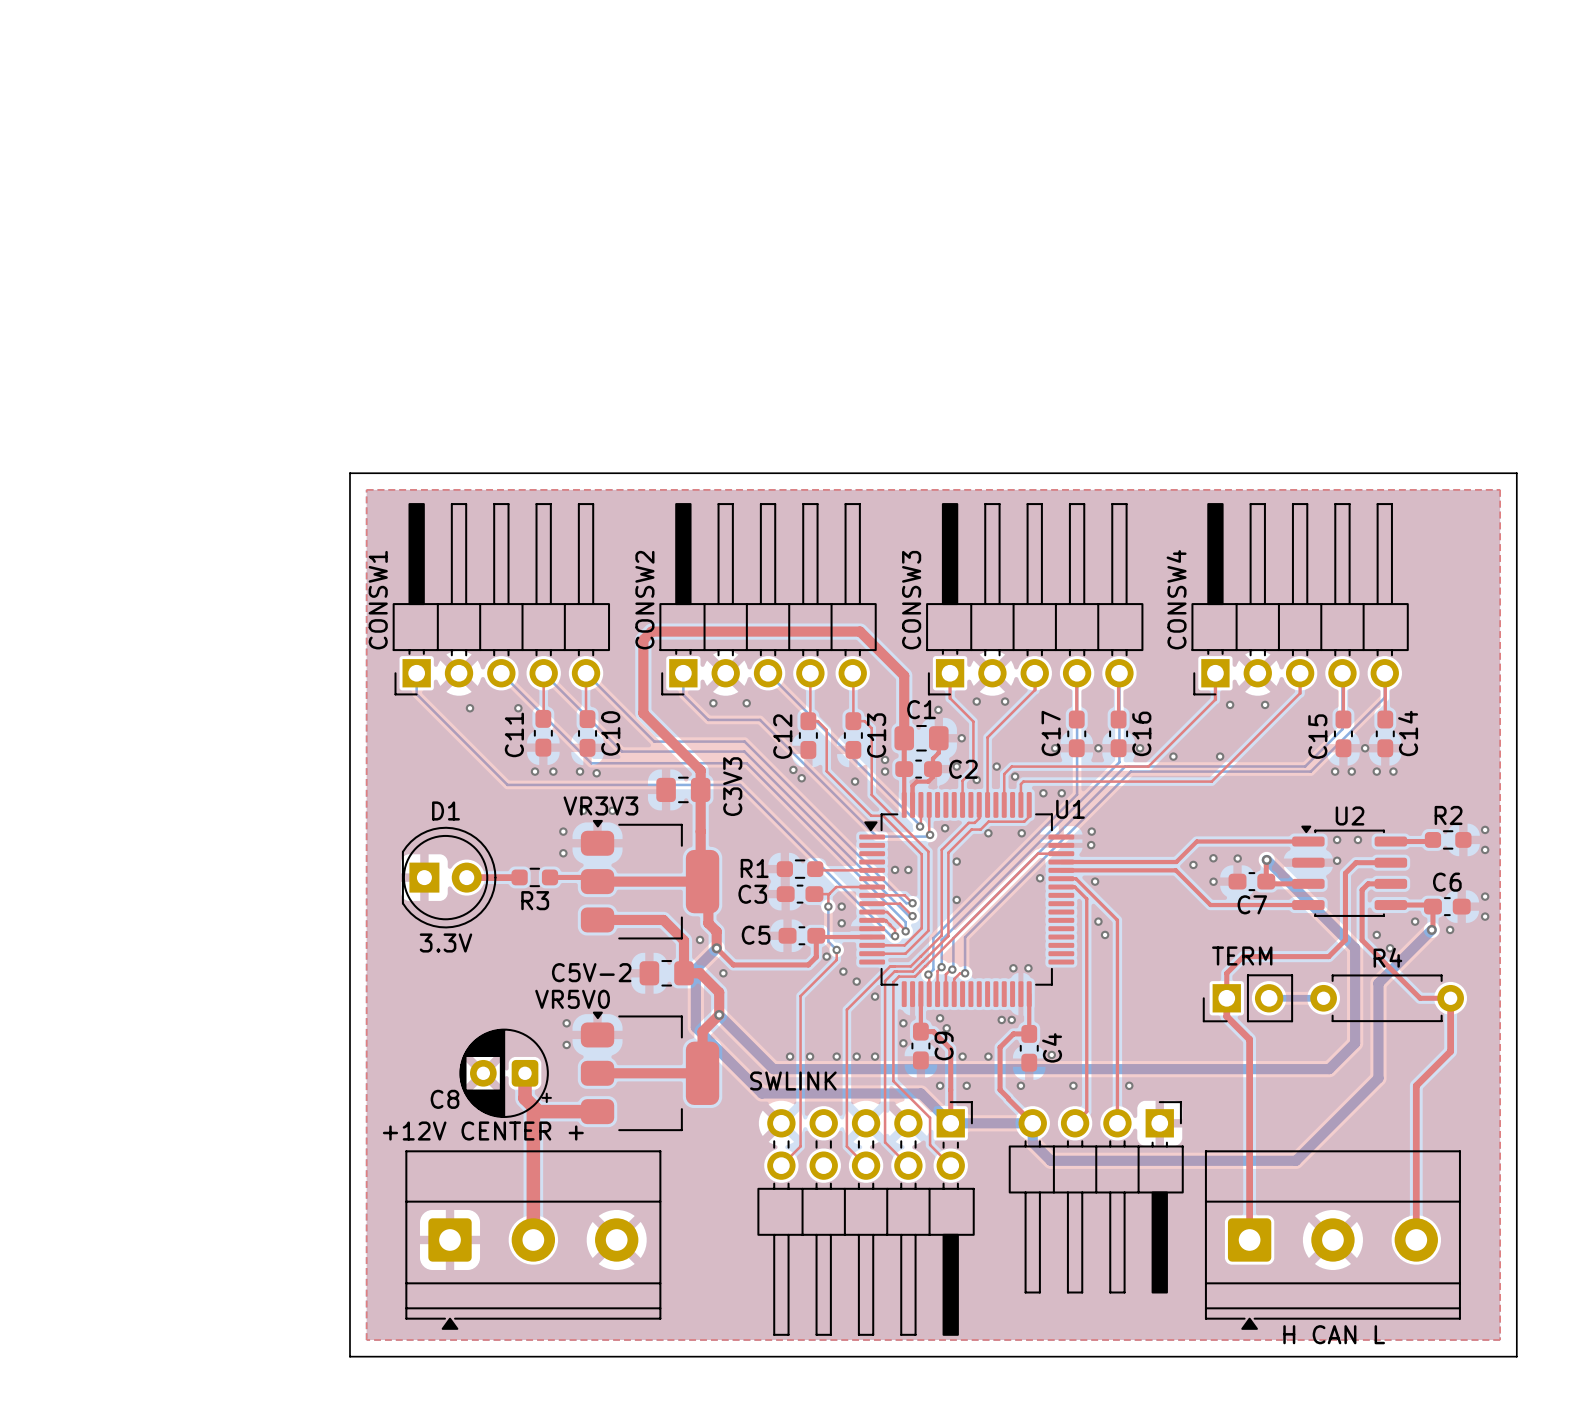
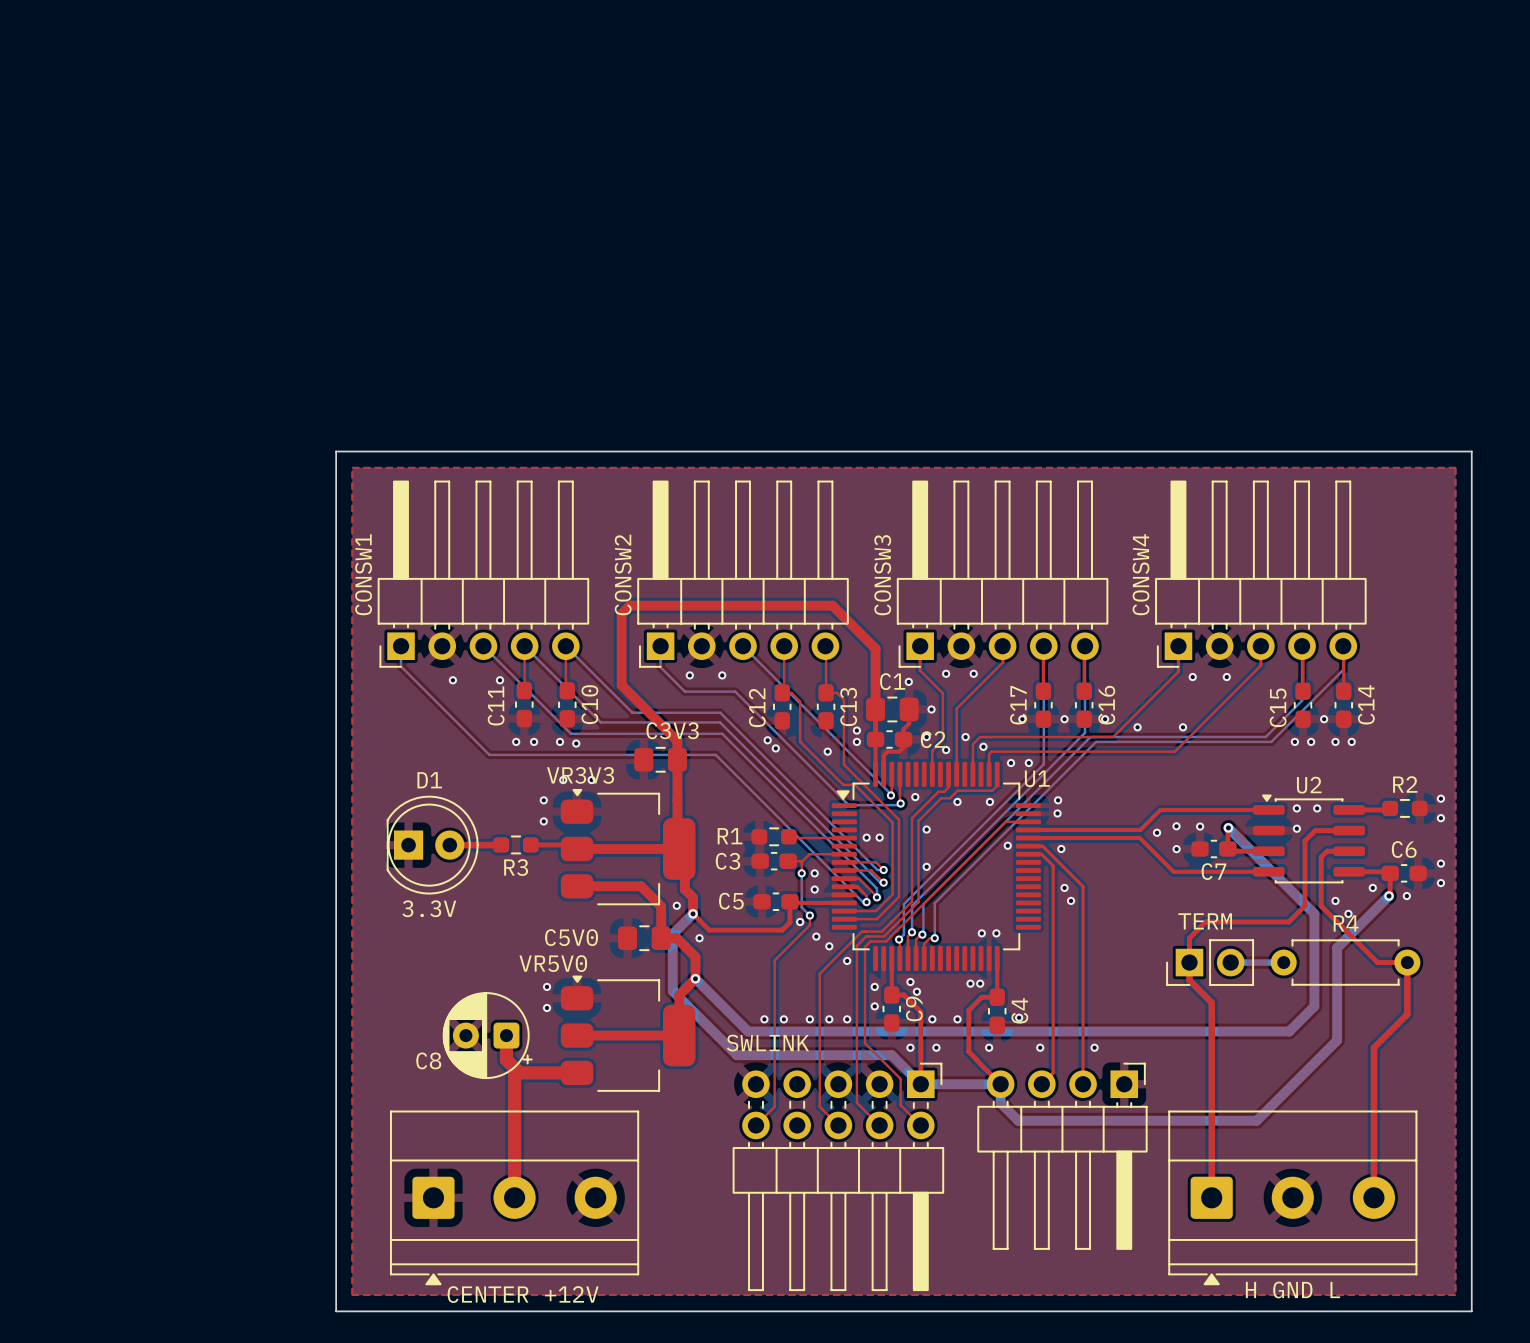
C3V3 name rotation: 0° (732, 786) -> 90° clockwise (672, 730)
C5V-2 name: C5V-2 (591, 972) -> C5V0 (571, 937)
part value: +12V CENTER + (483, 1131) -> CENTER +12V (523, 1294)
part value: H CAN L (1334, 1334) -> H GND L (1292, 1289)

